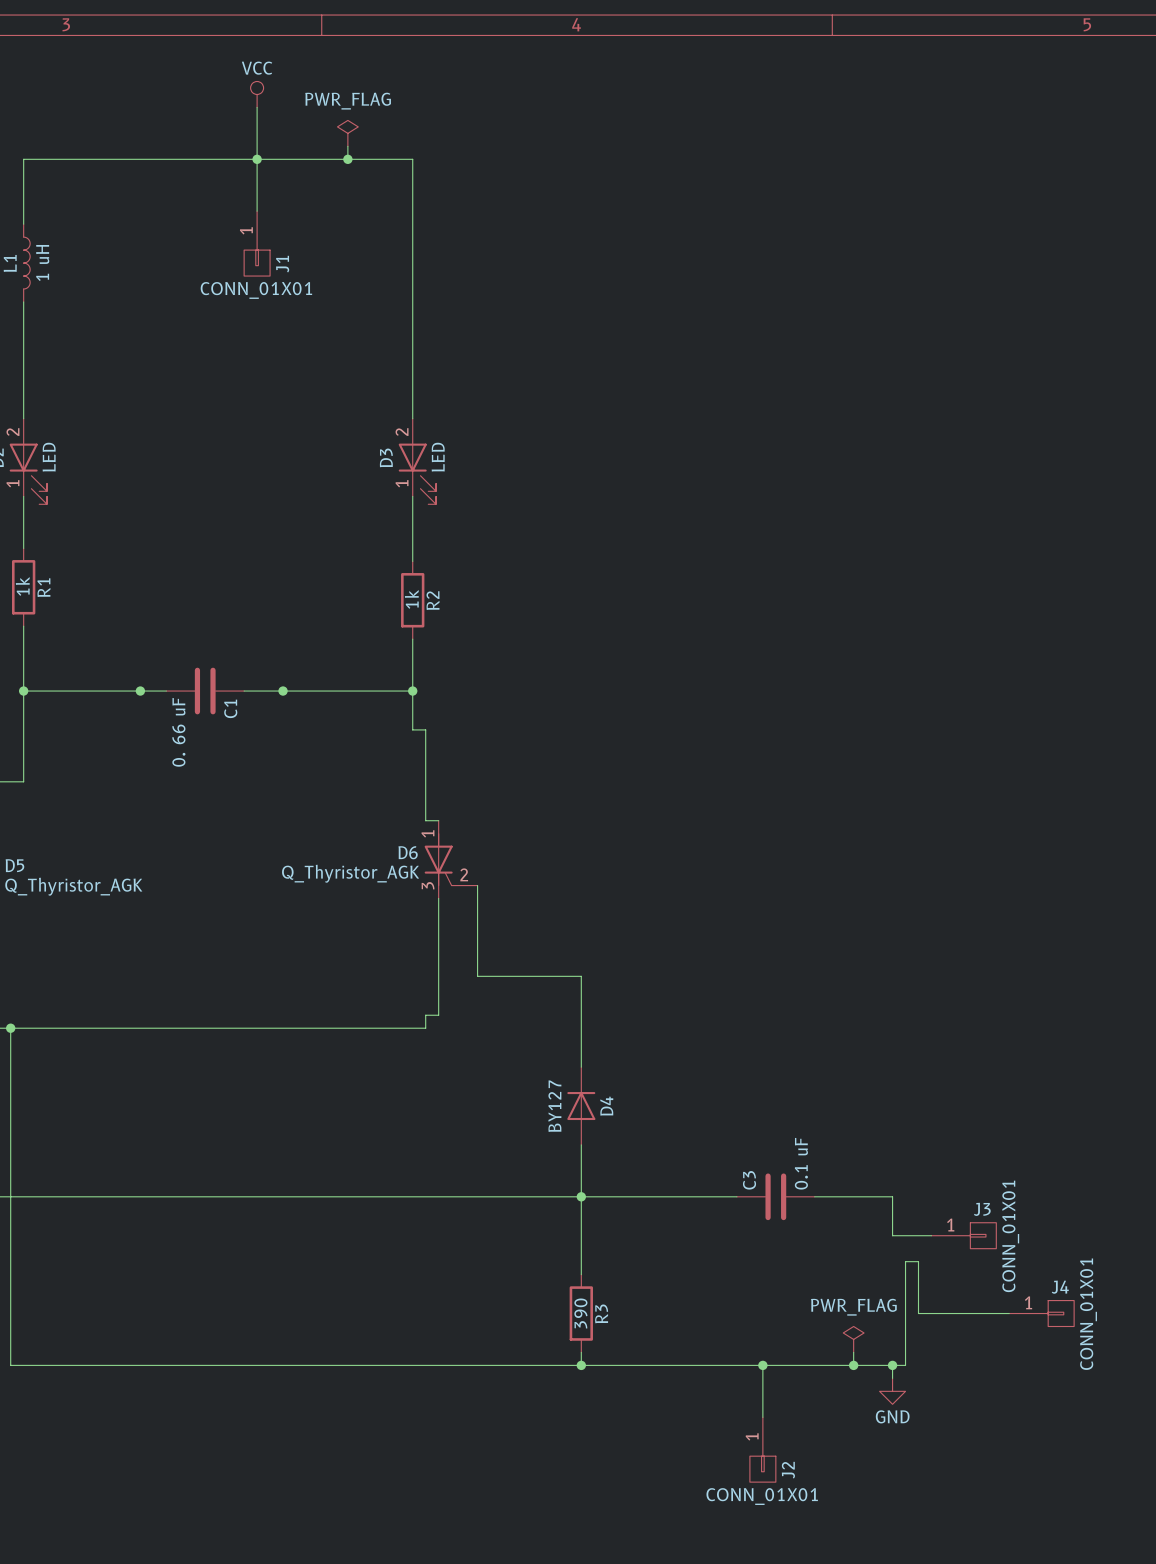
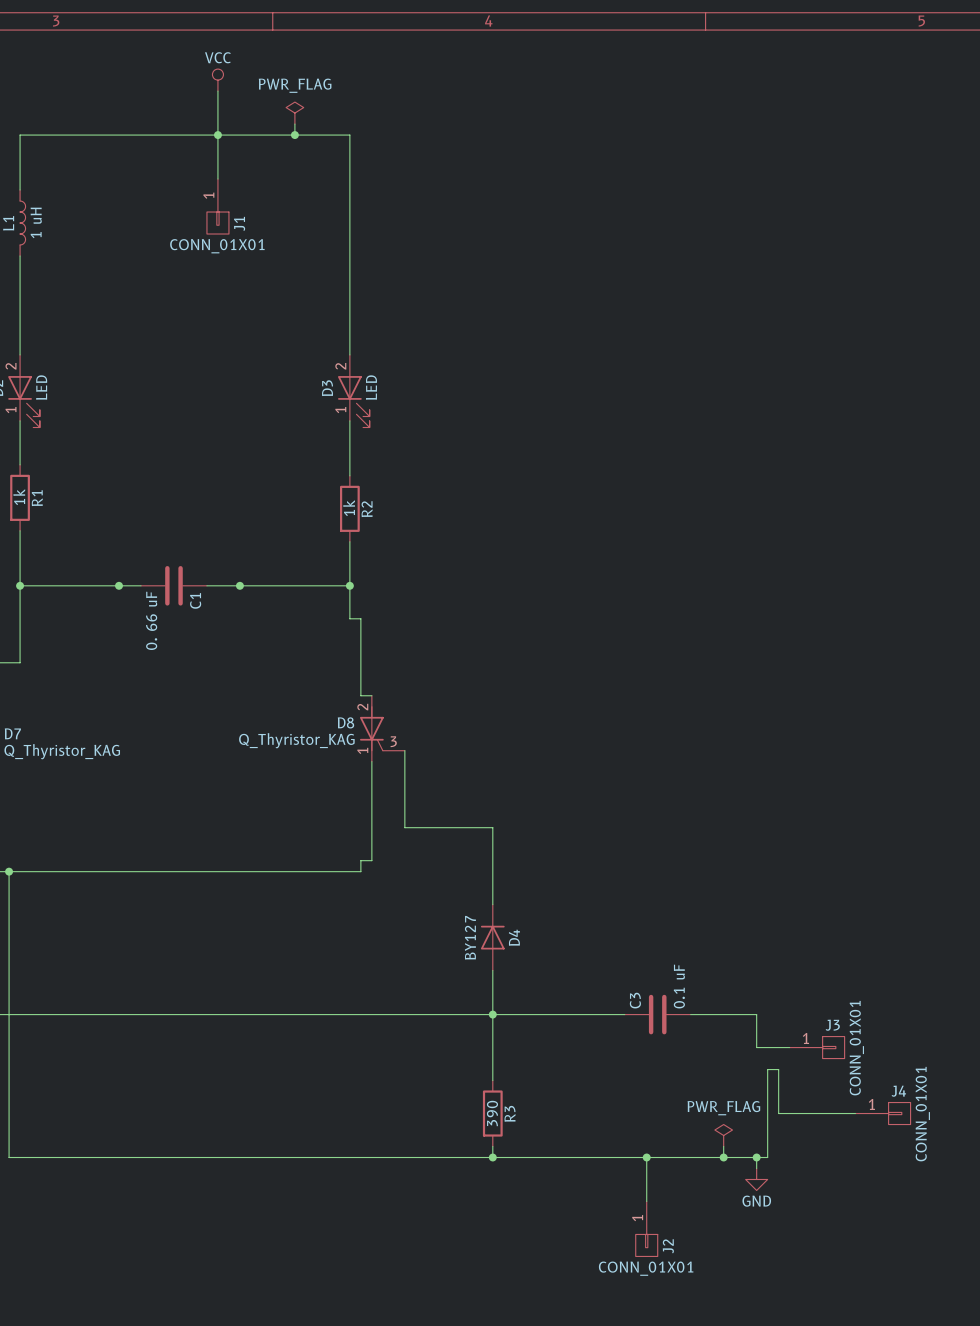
D6 pin number: 1 (427, 833) -> 2 (362, 707)
D6 name: D6 (408, 852) -> D8 (345, 722)
D5 name: D5 (14, 865) -> D7 (12, 733)
D6 value: Q_Thyristor_AGK (350, 873) -> Q_Thyristor_KAG (296, 740)
D6 pin number: 2 (464, 874) -> 3 (393, 741)
D6 pin number: 3 (428, 885) -> 1 (362, 750)
D5 value: Q_Thyristor_AGK (73, 886) -> Q_Thyristor_KAG (62, 751)

